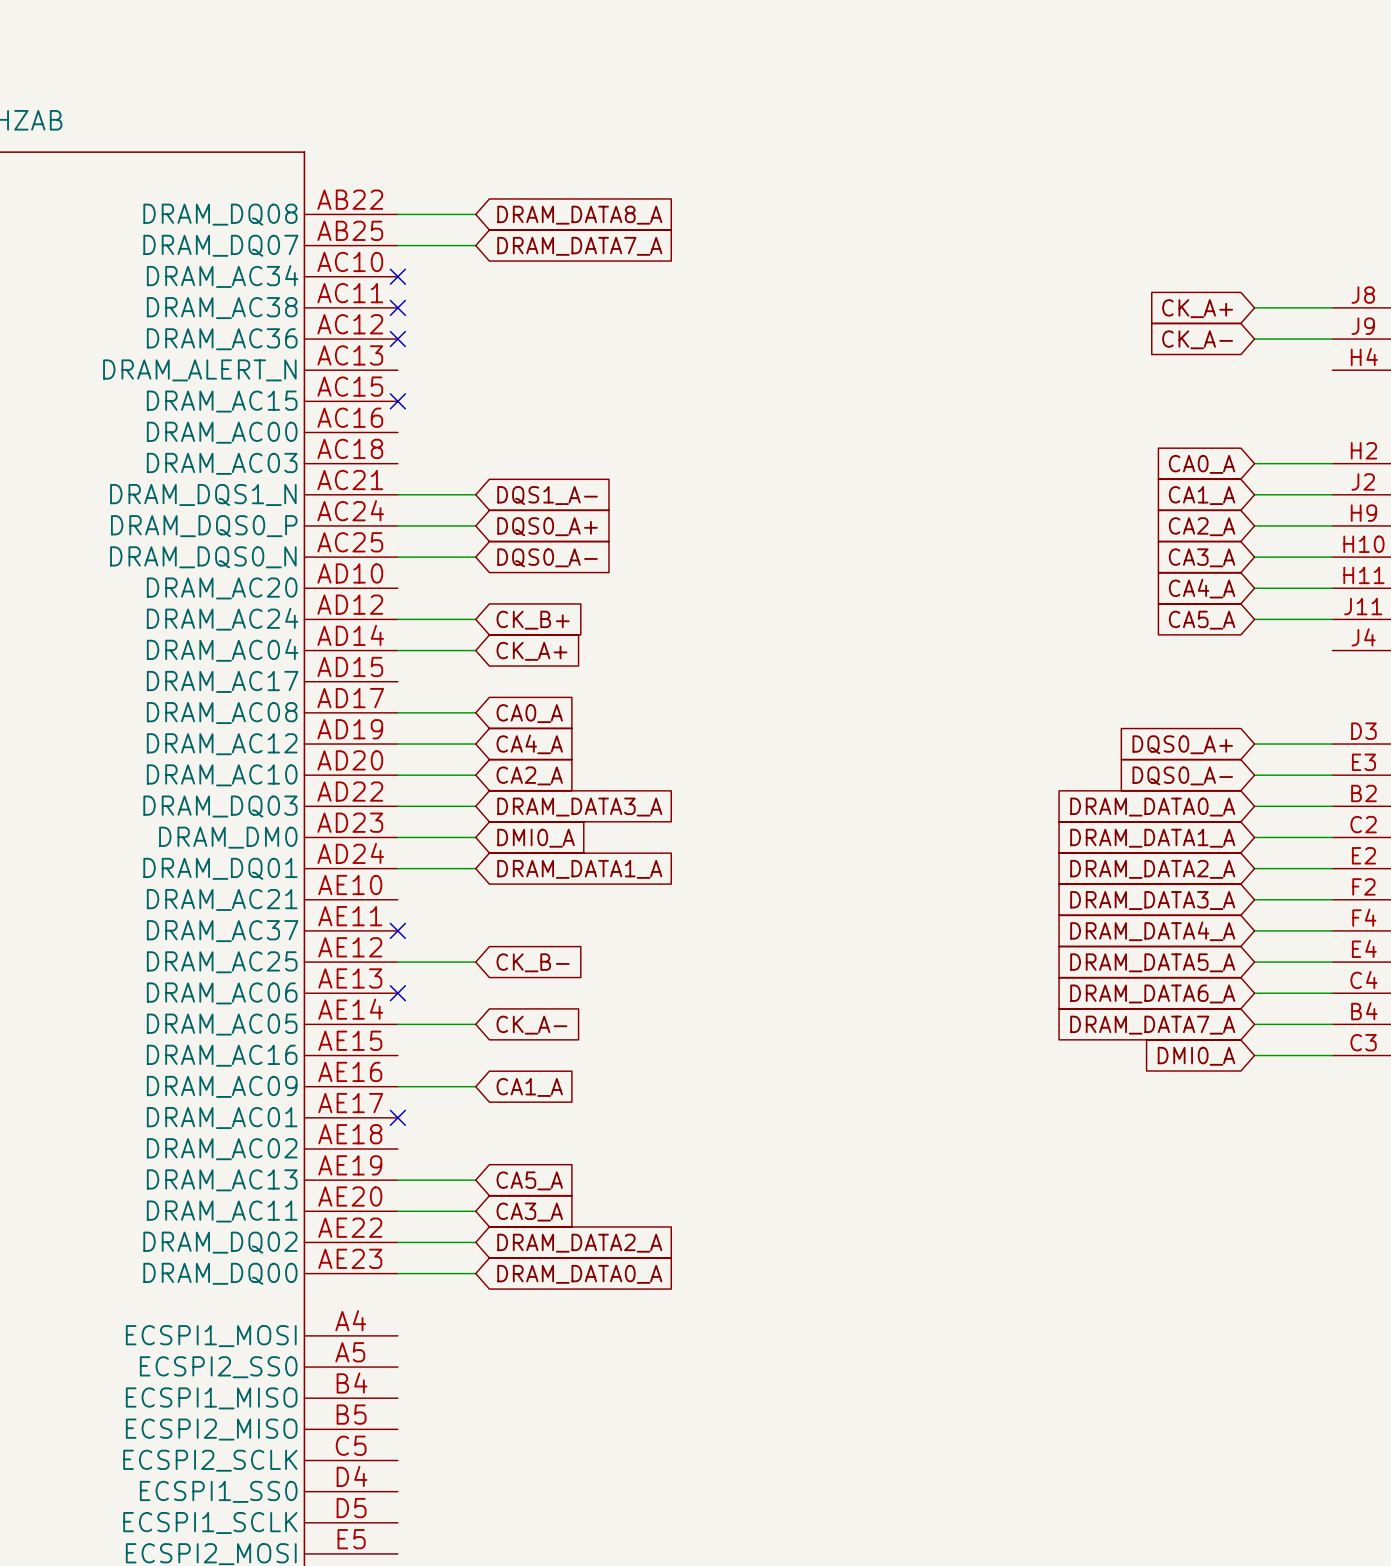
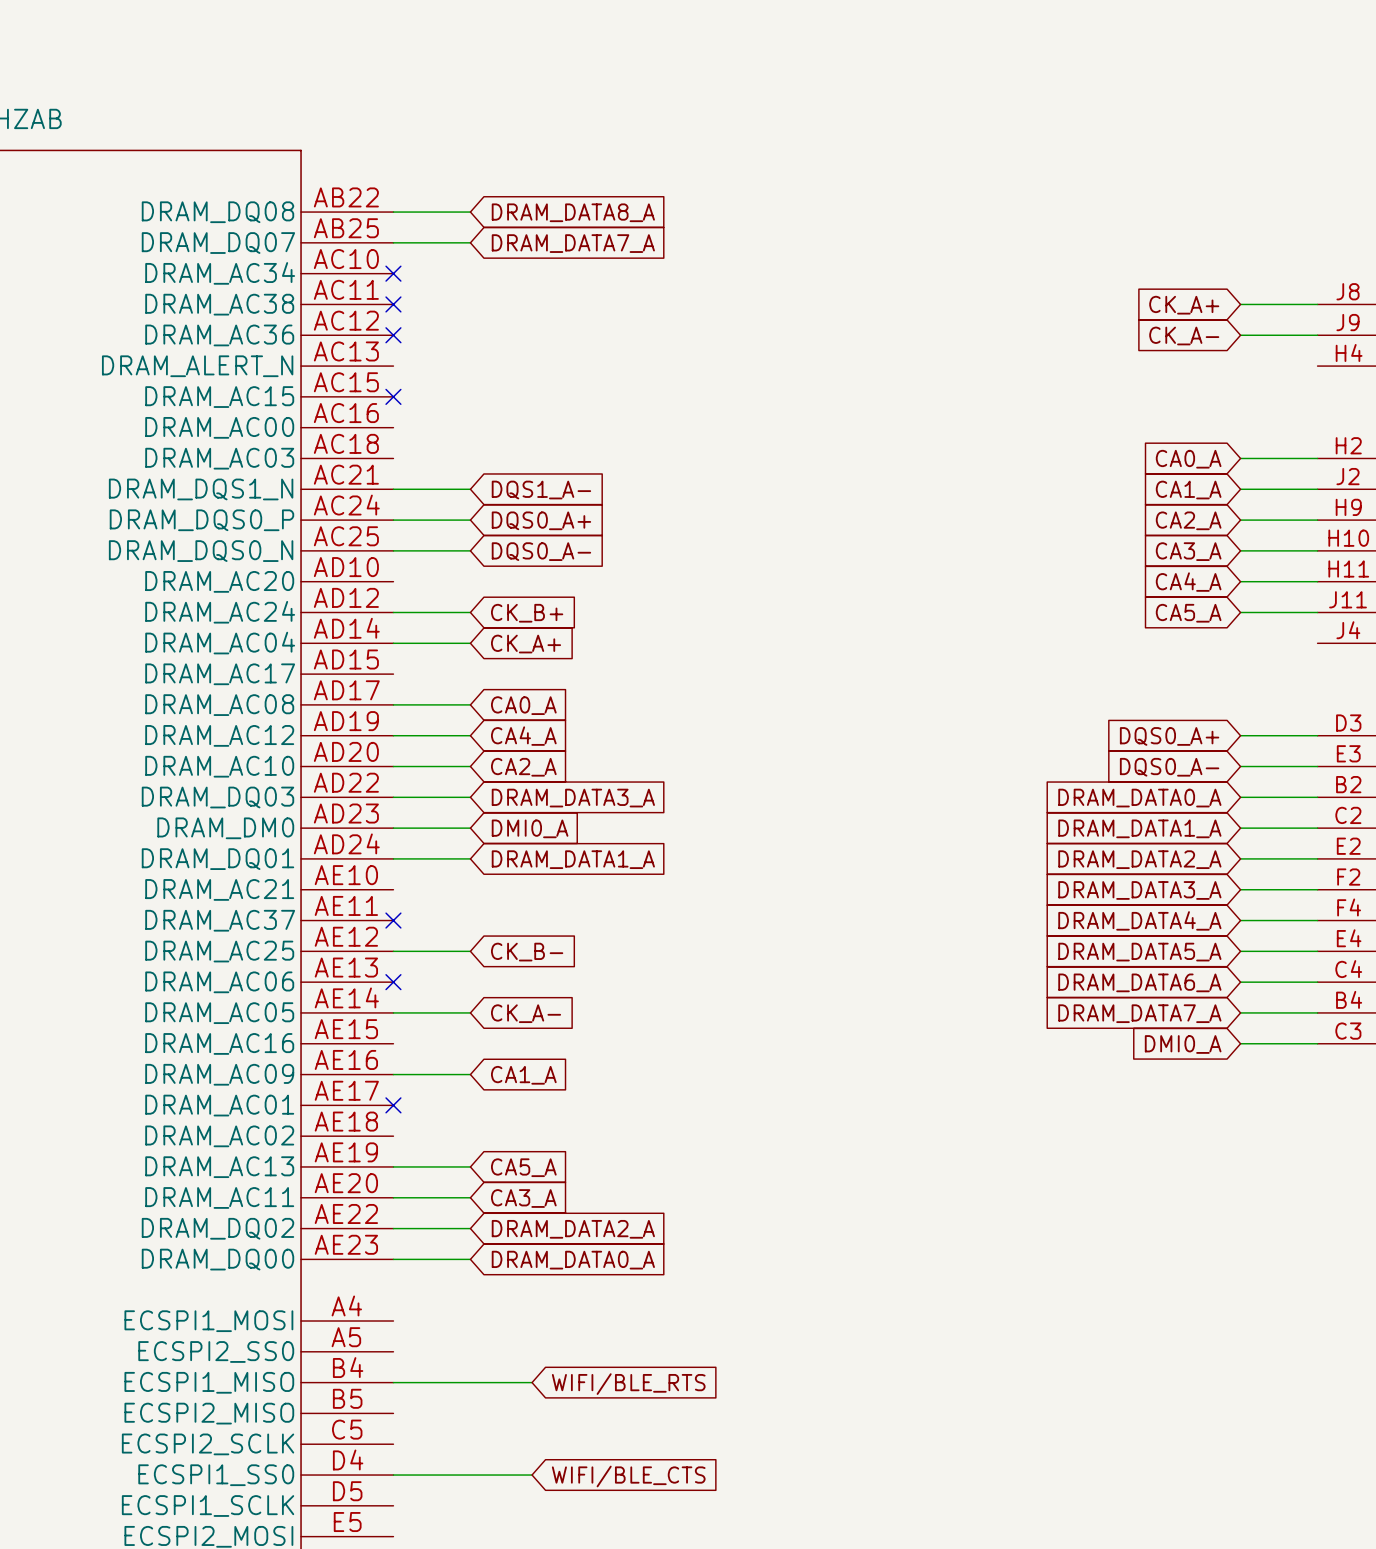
wire: none -> (393, 1382) (532, 1382)
global label: none -> WIFI/BLE_RTS (628, 1384)
wire: none -> (393, 1475) (532, 1475)
global label: none -> WIFI/BLE_CTS (628, 1476)

